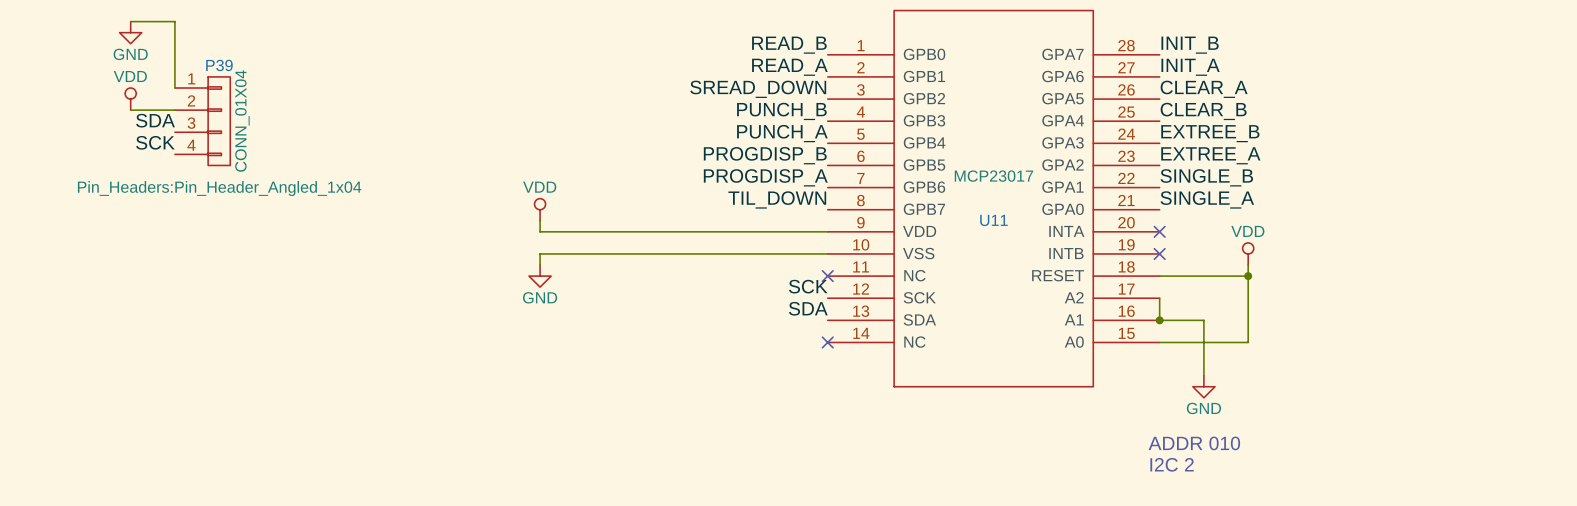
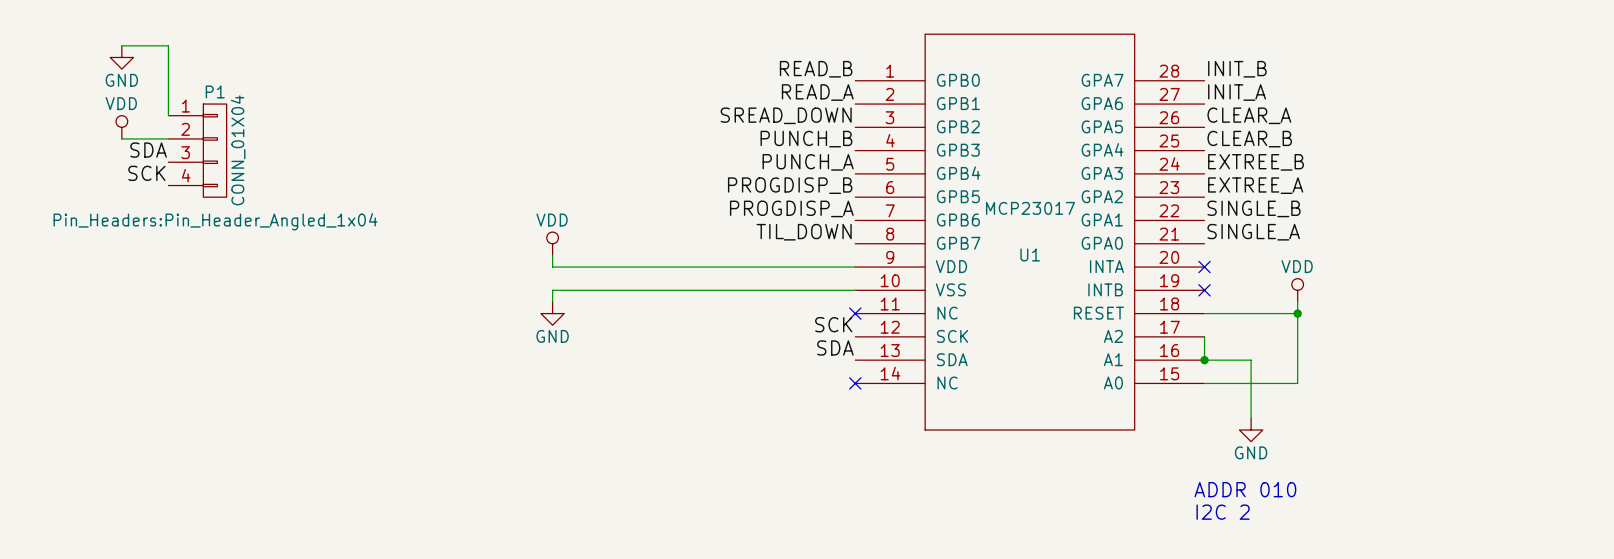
P39 name: P39 (219, 65) -> P1 (215, 91)
U11 name: U11 (993, 220) -> U1 (1030, 254)

